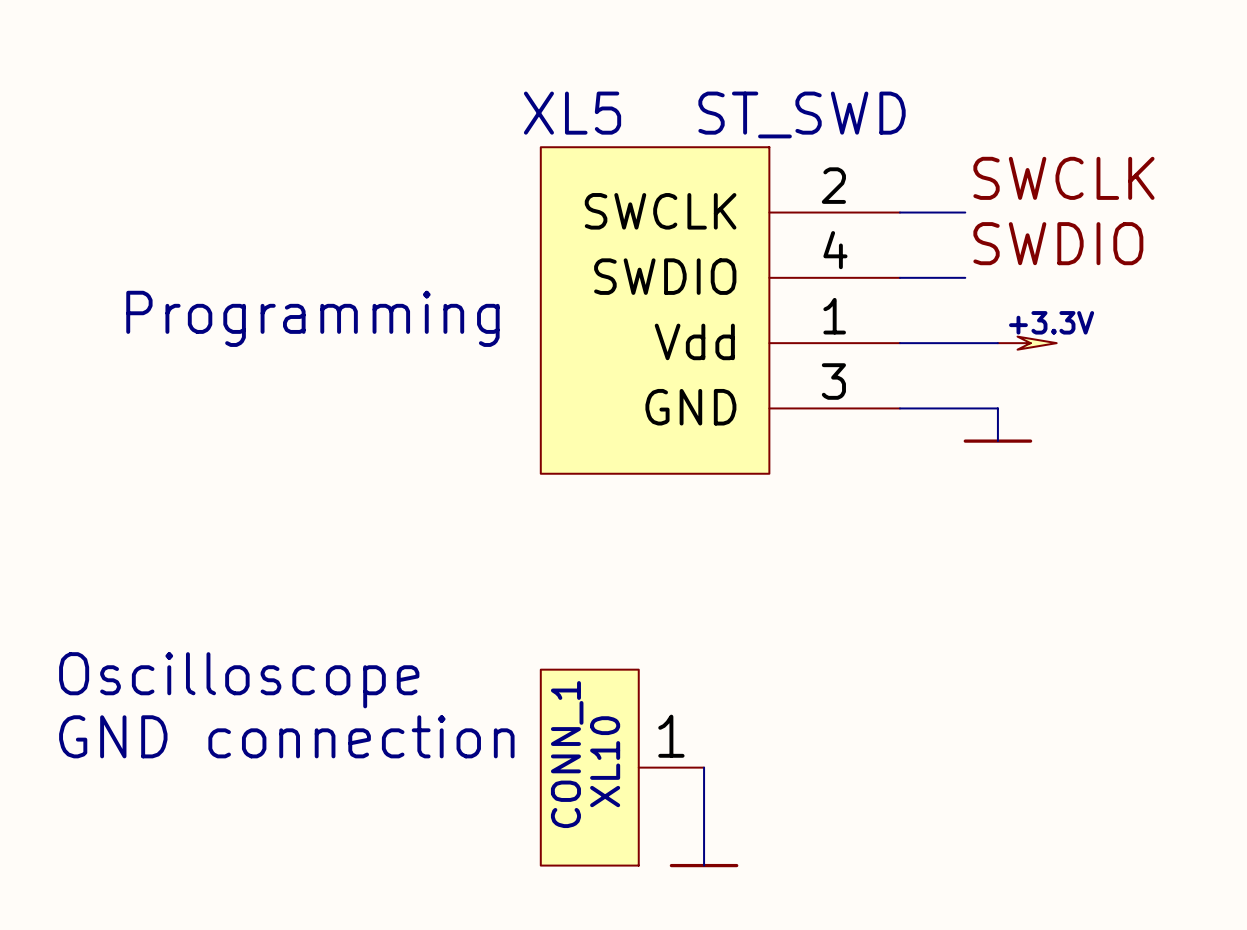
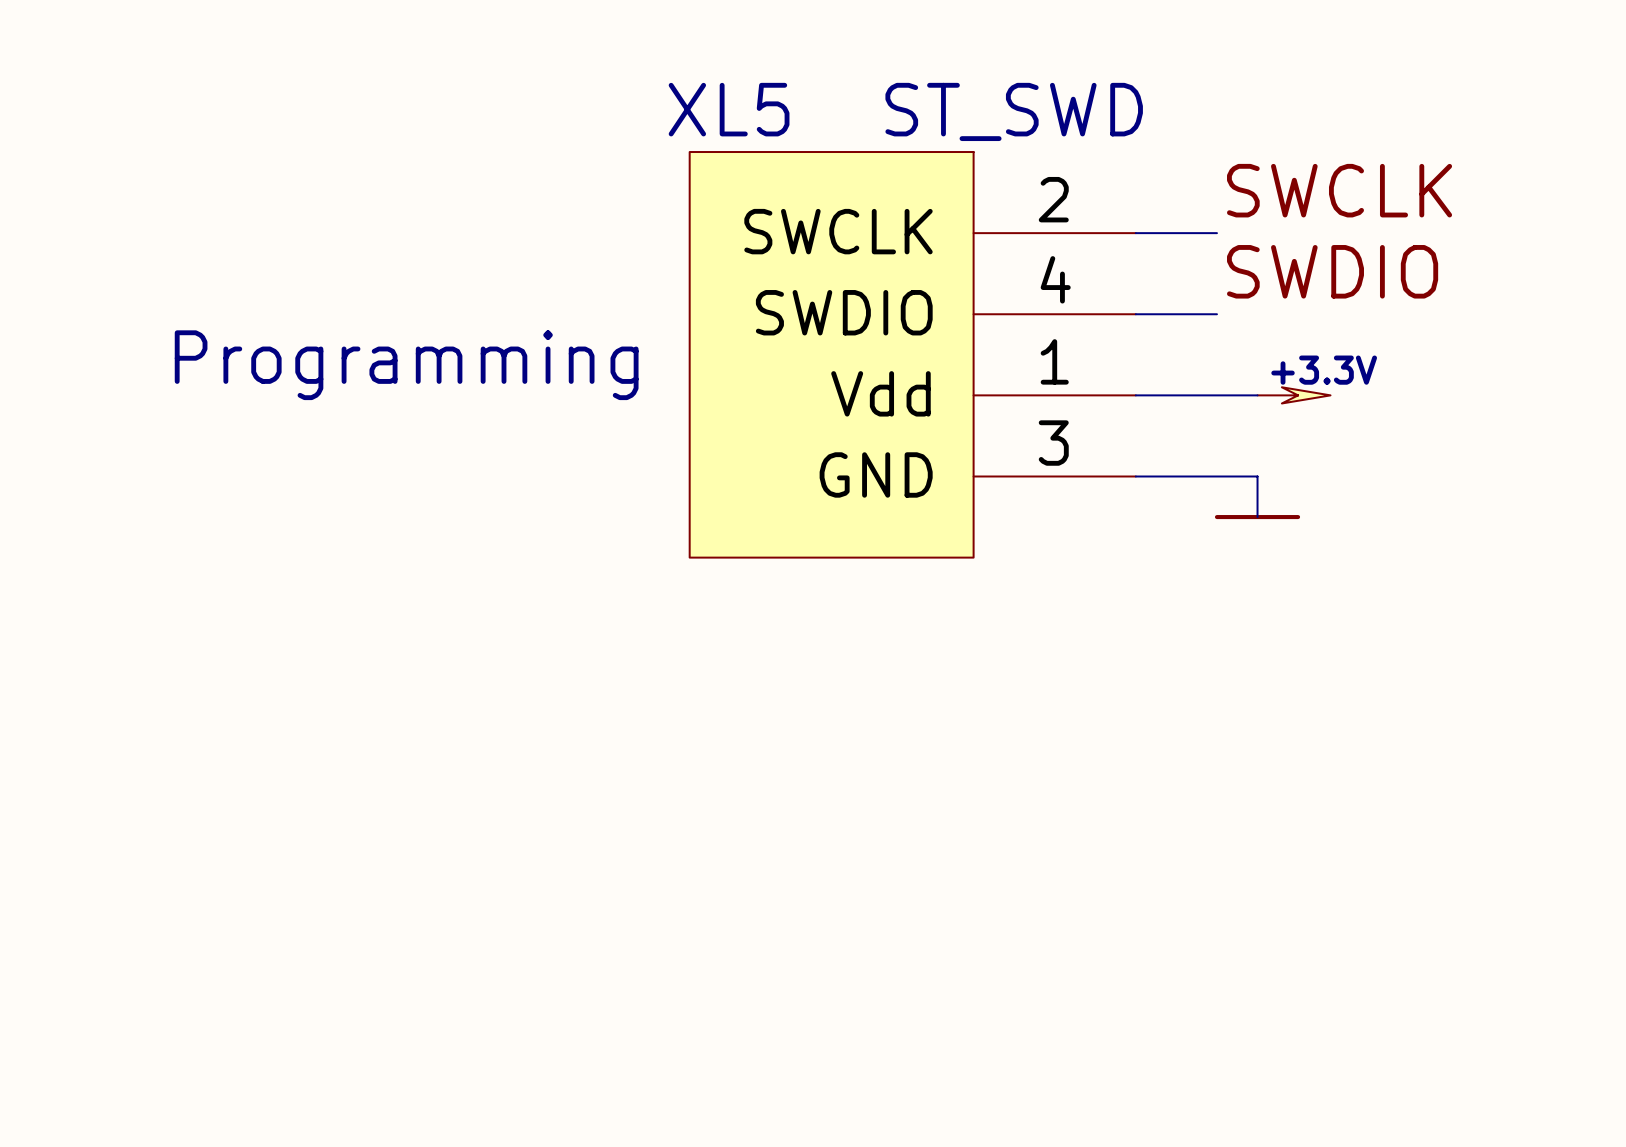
text: Oscilloscope (239, 680) -> none
text: GND connection (286, 736) -> none
XL10: CONN_1 (622, 767) -> none
wire: (704, 767) (704, 865) -> none
power symbol: (704, 865) -> none

